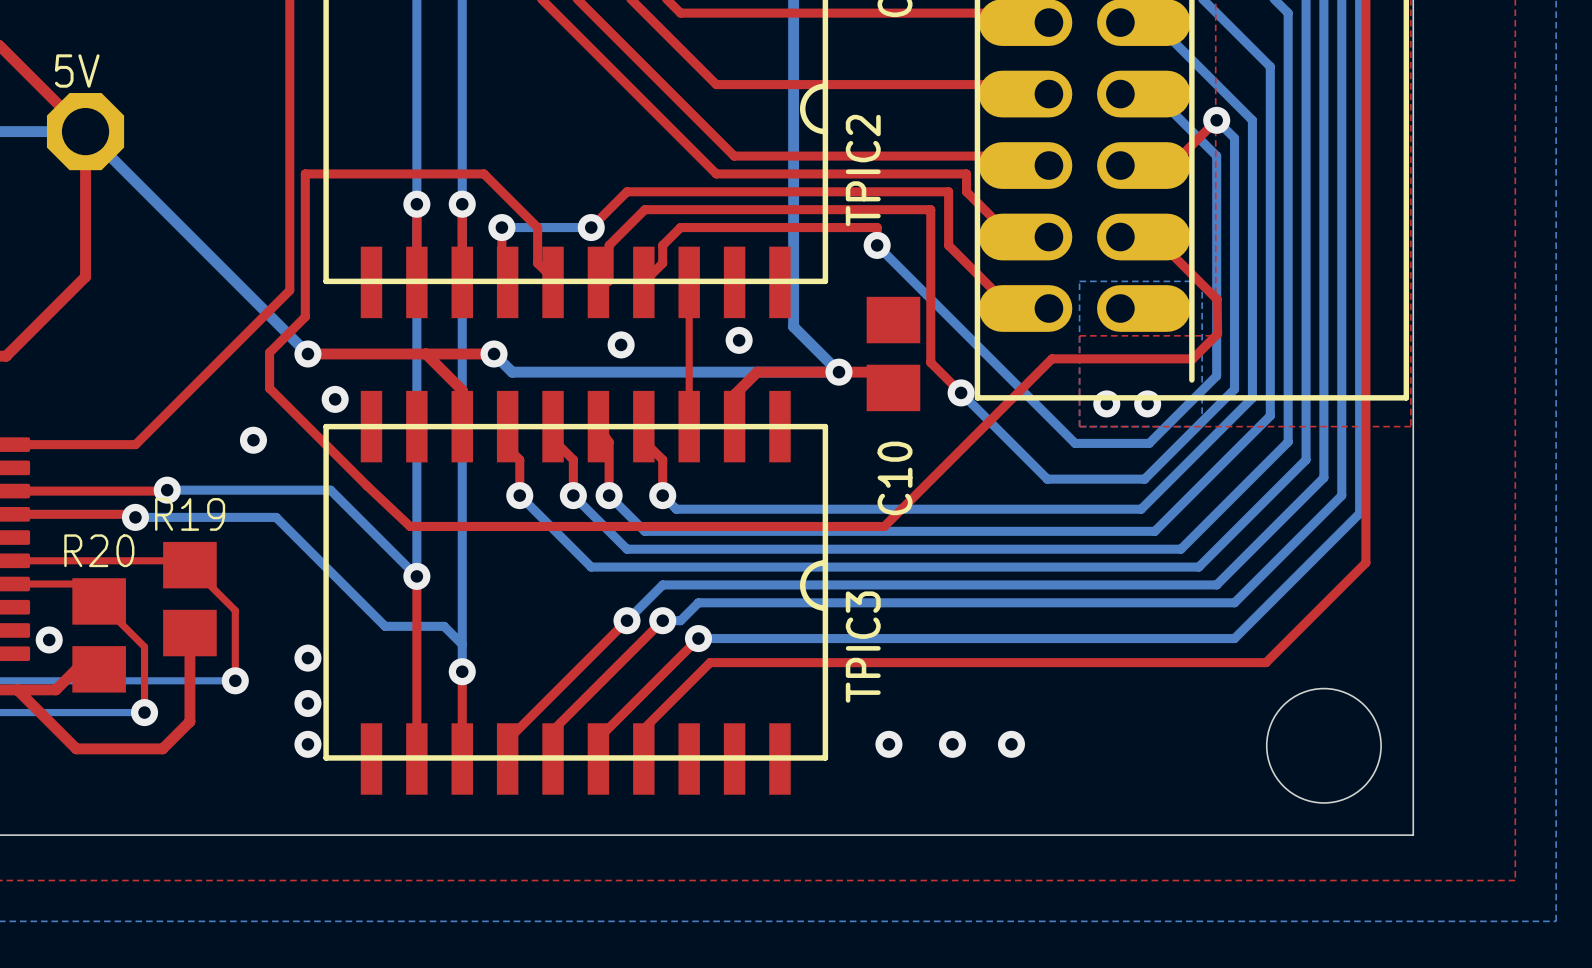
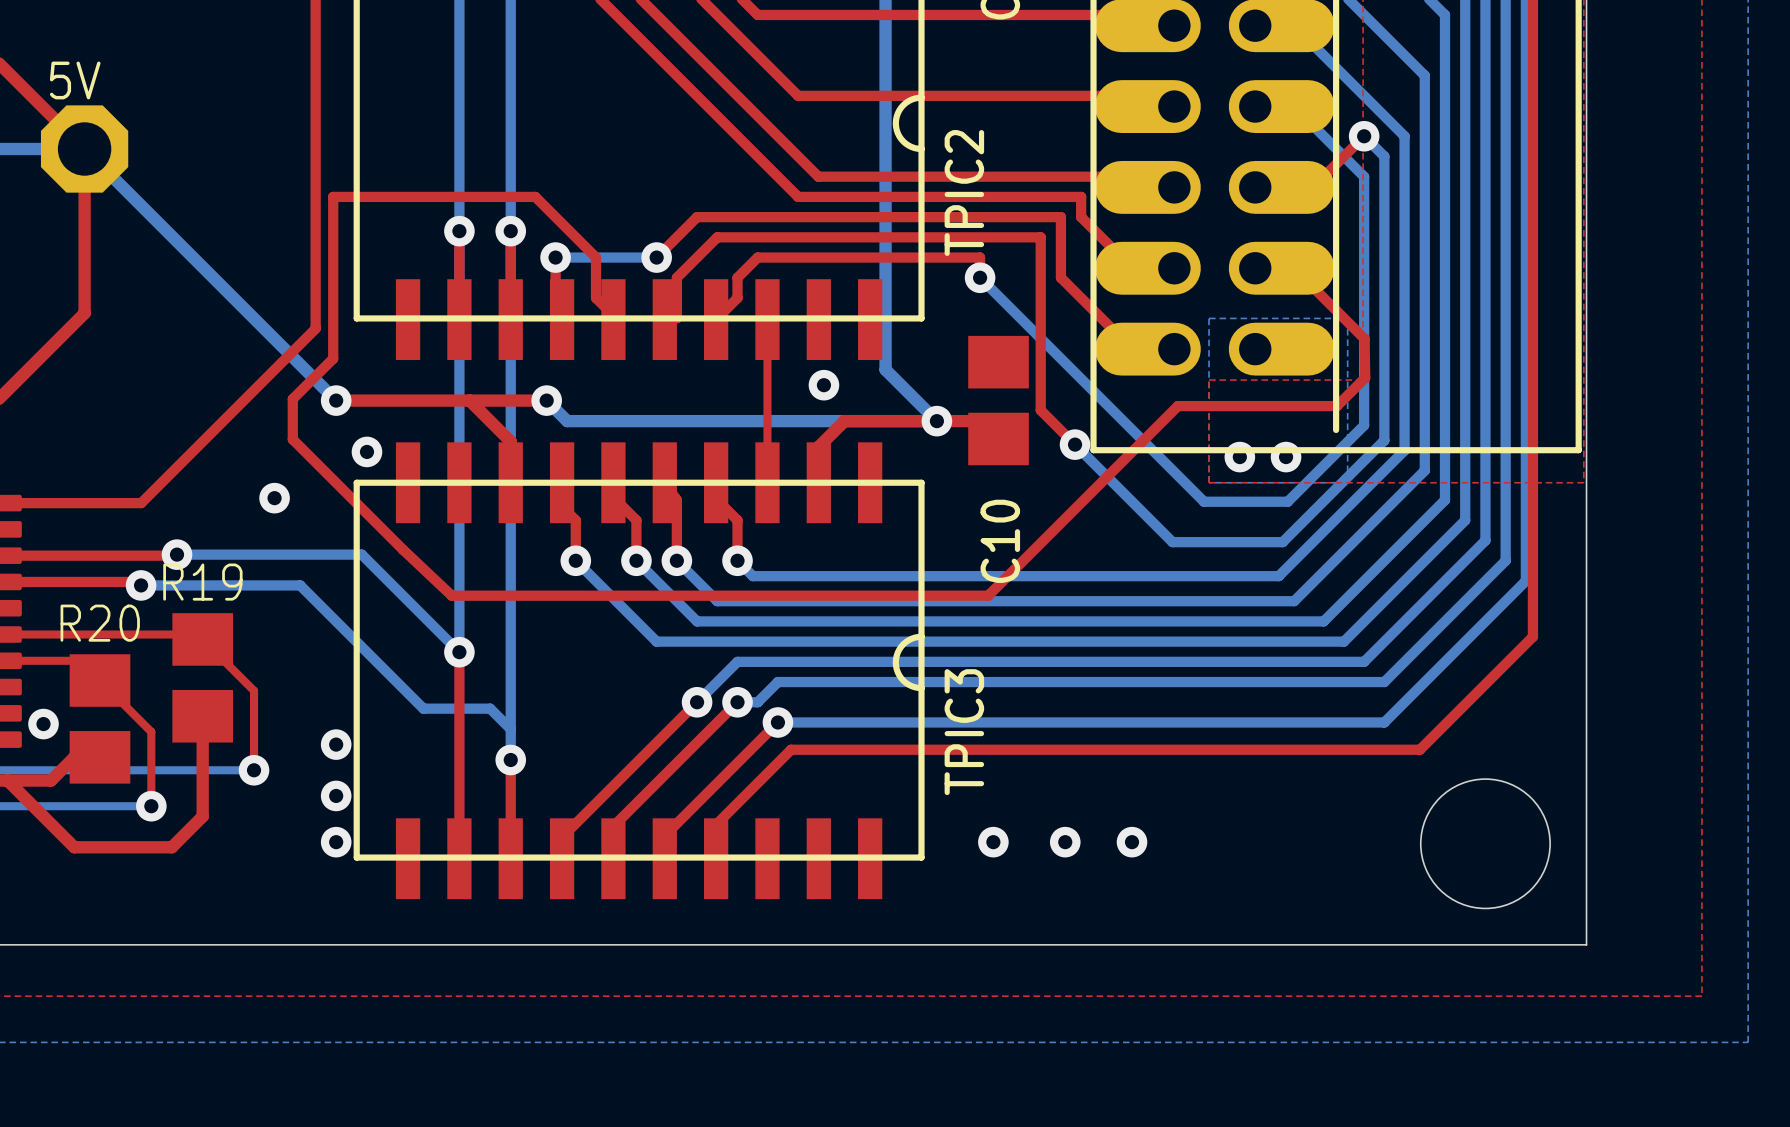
via: (621, 344) -> none

